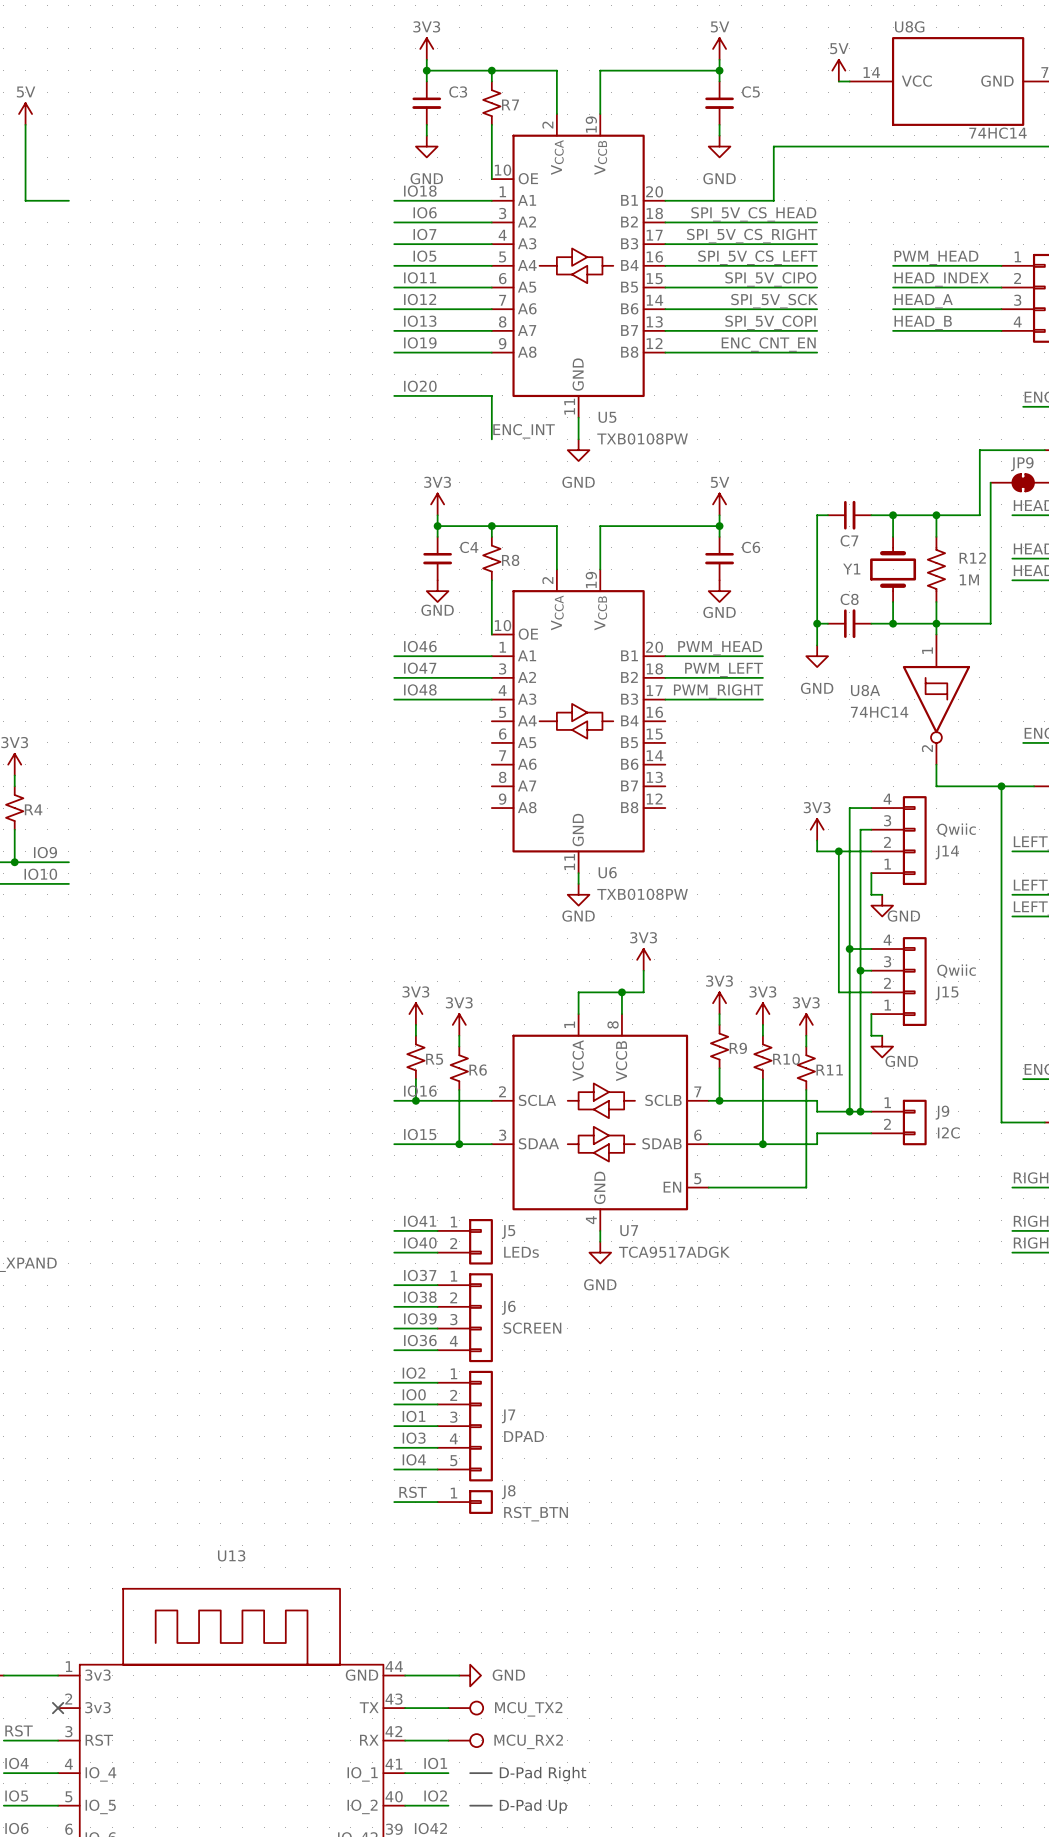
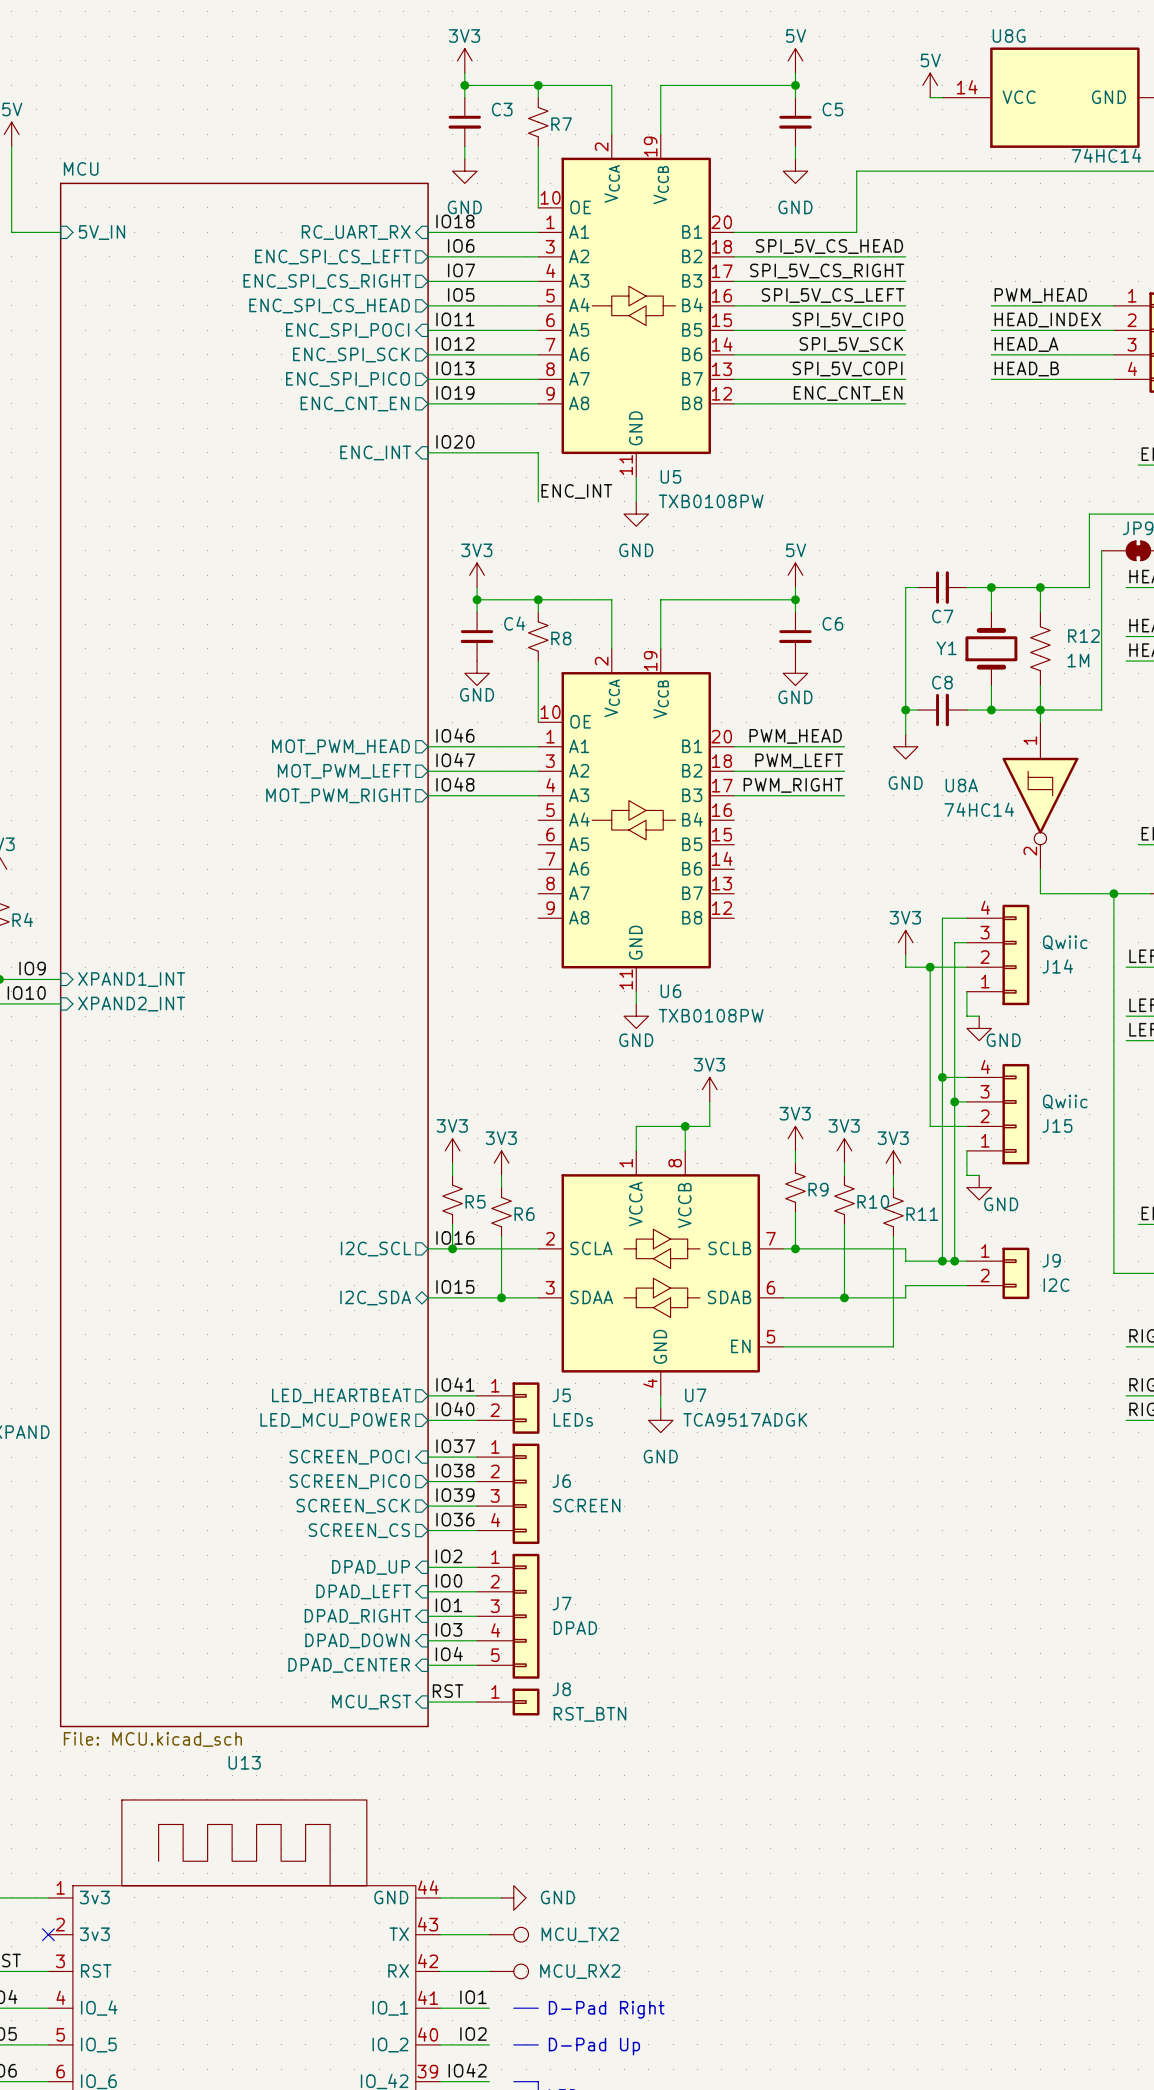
sheet pin: none -> 5V_IN (101, 232)
sheet pin: none -> RC_UART_RX (356, 232)
sheet pin: none -> ENC_SPI_CS_LEFT (333, 257)
sheet pin: none -> ENC_SPI_CS_RIGHT (327, 281)
sheet pin: none -> ENC_SPI_CS_HEAD (329, 305)
sheet pin: none -> ENC_SPI_POCI (347, 330)
sheet pin: none -> ENC_SPI_SCK (351, 354)
sheet pin: none -> ENC_SPI_PICO (347, 379)
sheet pin: none -> ENC_CNT_EN (354, 403)
sheet pin: none -> ENC_INT (375, 452)
sheet pin: none -> MOT_PWM_HEAD (340, 746)
sheet pin: none -> MOT_PWM_LEFT (344, 771)
sheet pin: none -> MOT_PWM_RIGHT (338, 795)
sheet MCU: none -> File: MCU.kicad_sch (244, 954)
sheet pin: none -> XPAND1_INT (131, 979)
sheet pin: none -> XPAND2_INT (131, 1004)
sheet pin: none -> I2C_SCL (375, 1249)
sheet pin: none -> I2C_SDA (375, 1297)
sheet pin: none -> LED_HEARTBEAT (341, 1395)
sheet pin: none -> LED_MCU_POWER (335, 1420)
sheet pin: none -> SCREEN_POCI (349, 1457)
sheet pin: none -> SCREEN_PICO (349, 1481)
sheet pin: none -> SCREEN_SCK (353, 1506)
sheet pin: none -> SCREEN_CS (359, 1530)
sheet pin: none -> DPAD_UP (371, 1567)
sheet pin: none -> DPAD_LEFT (363, 1591)
sheet pin: none -> DPAD_RIGHT (357, 1616)
sheet pin: none -> DPAD_DOWN (357, 1640)
sheet pin: none -> DPAD_CENTER (349, 1665)
sheet pin: none -> MCU_RST (371, 1702)

